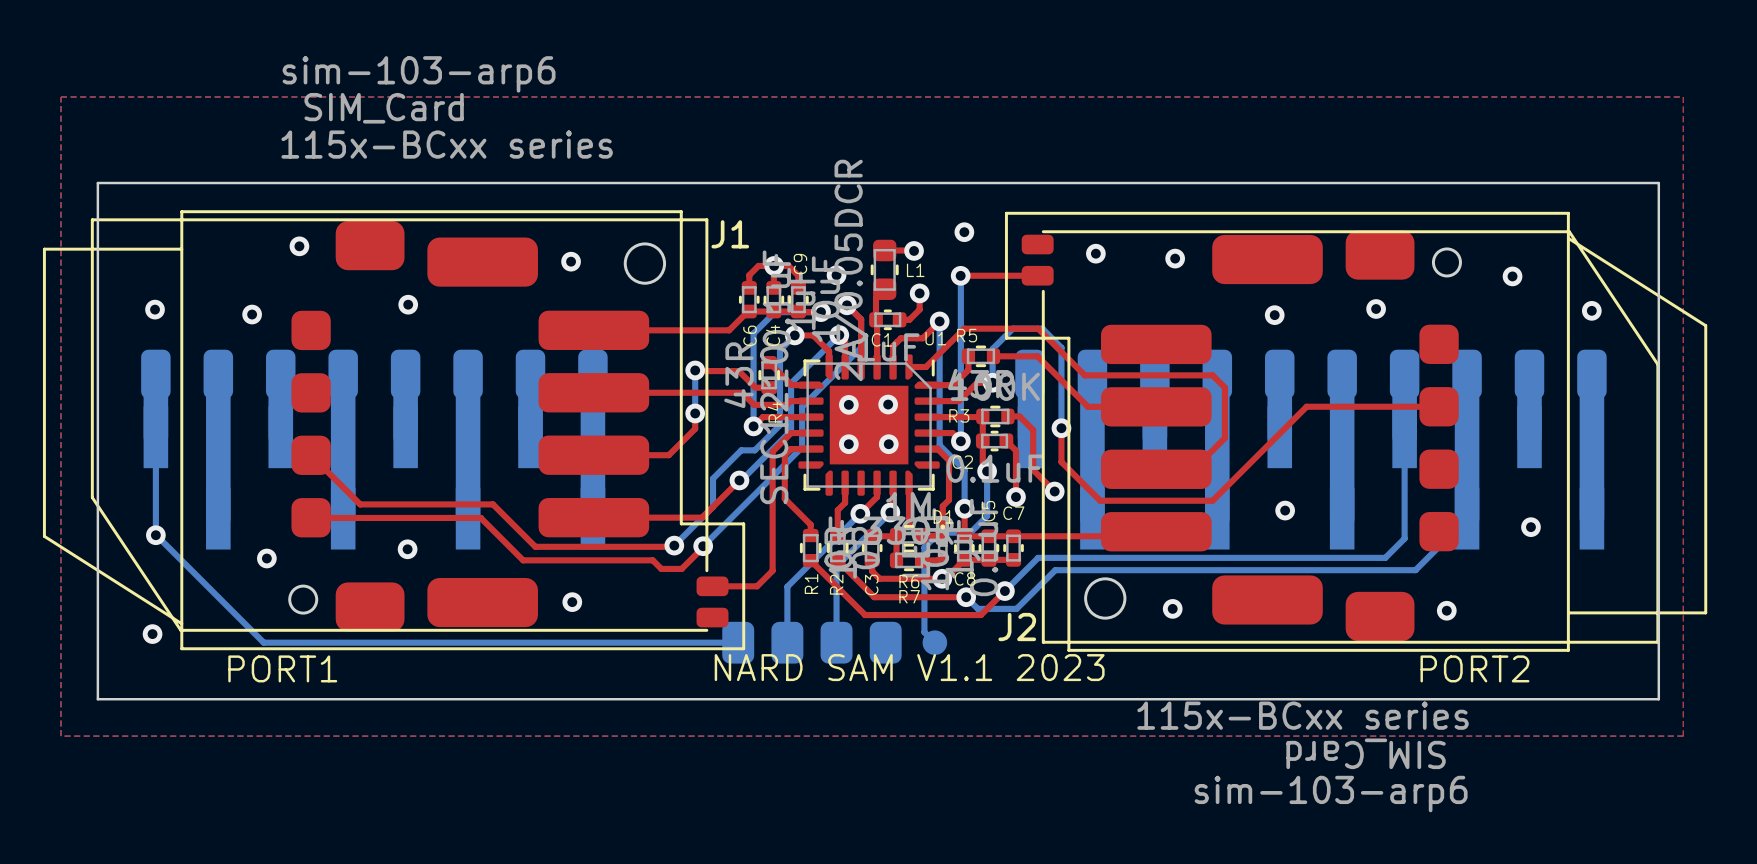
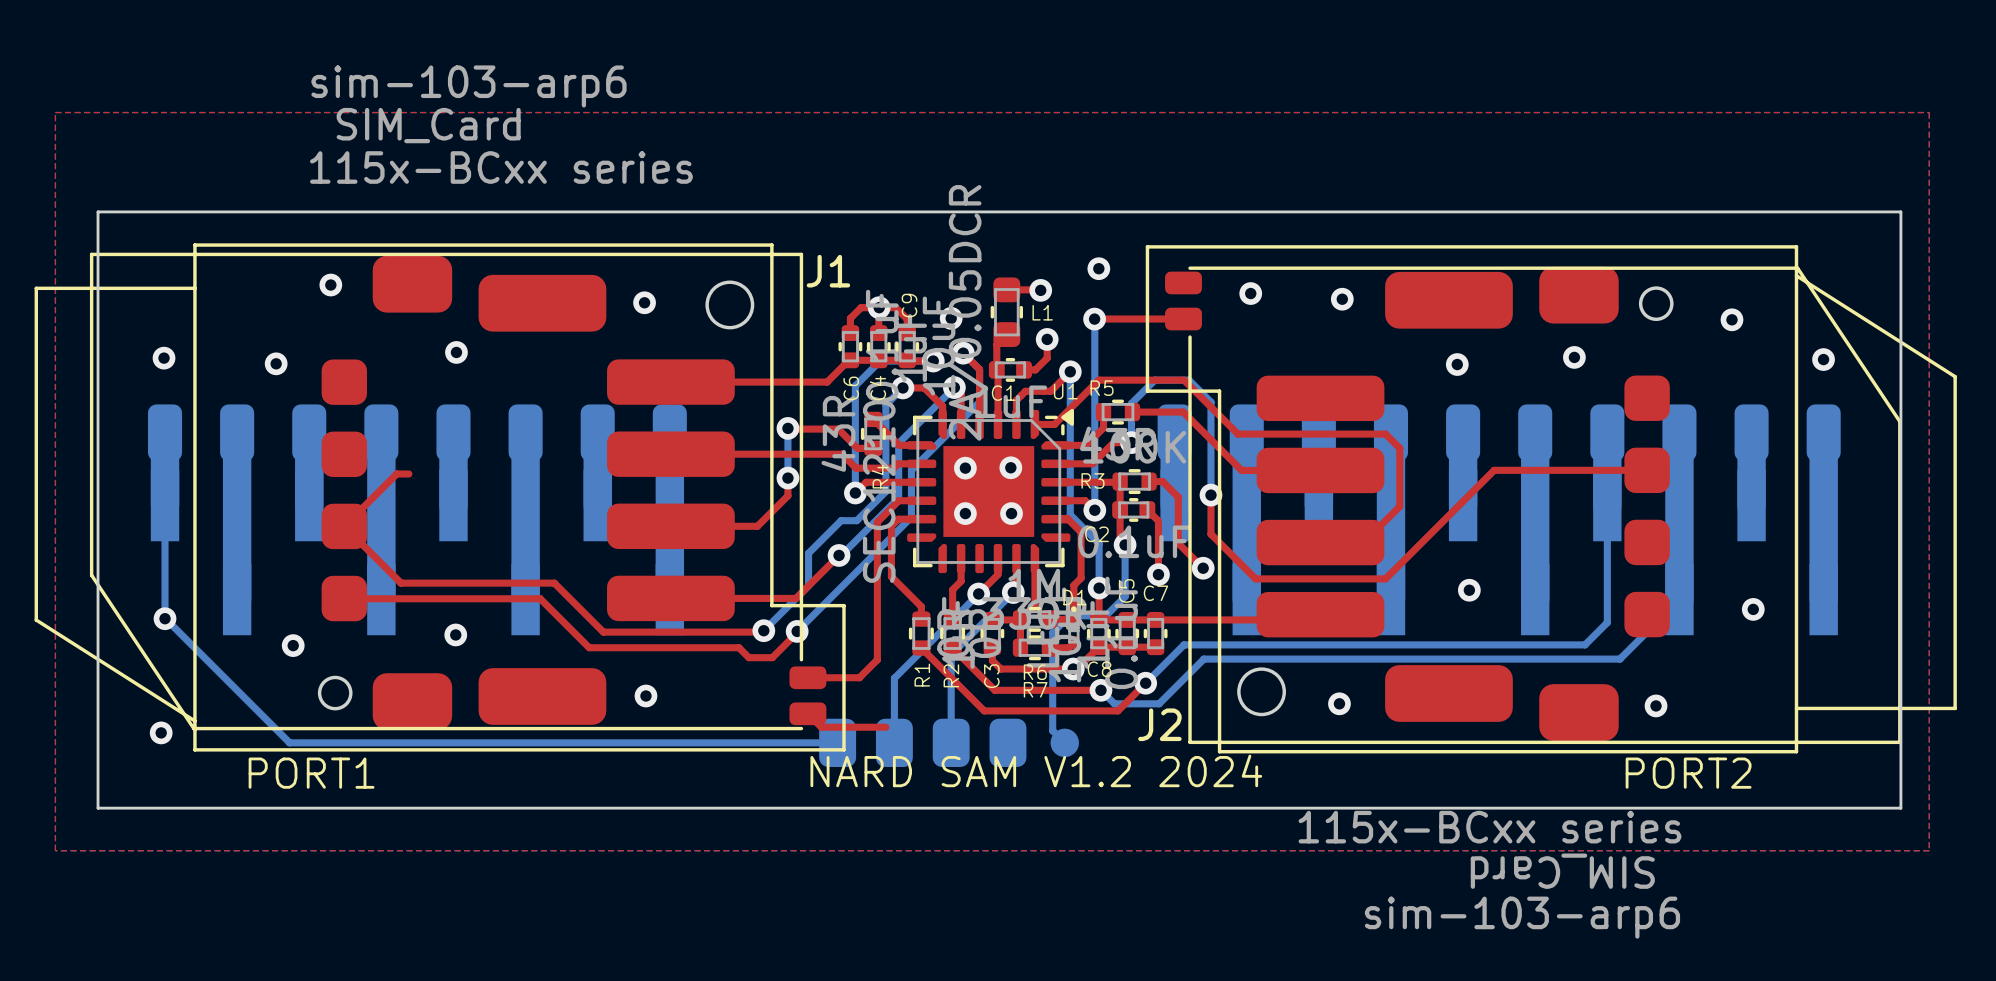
U1 footprint: [798, 354, 940, 496] -> [907, 408, 1074, 574]
top track: none -> (408, 473) (396, 473) (344, 526)
top track: none -> (807, 713) (821, 727) (885, 727)
text: NARD SAM V1.1 2023 (909, 667) -> NARD SAM V1.2 2024 (1036, 770)

